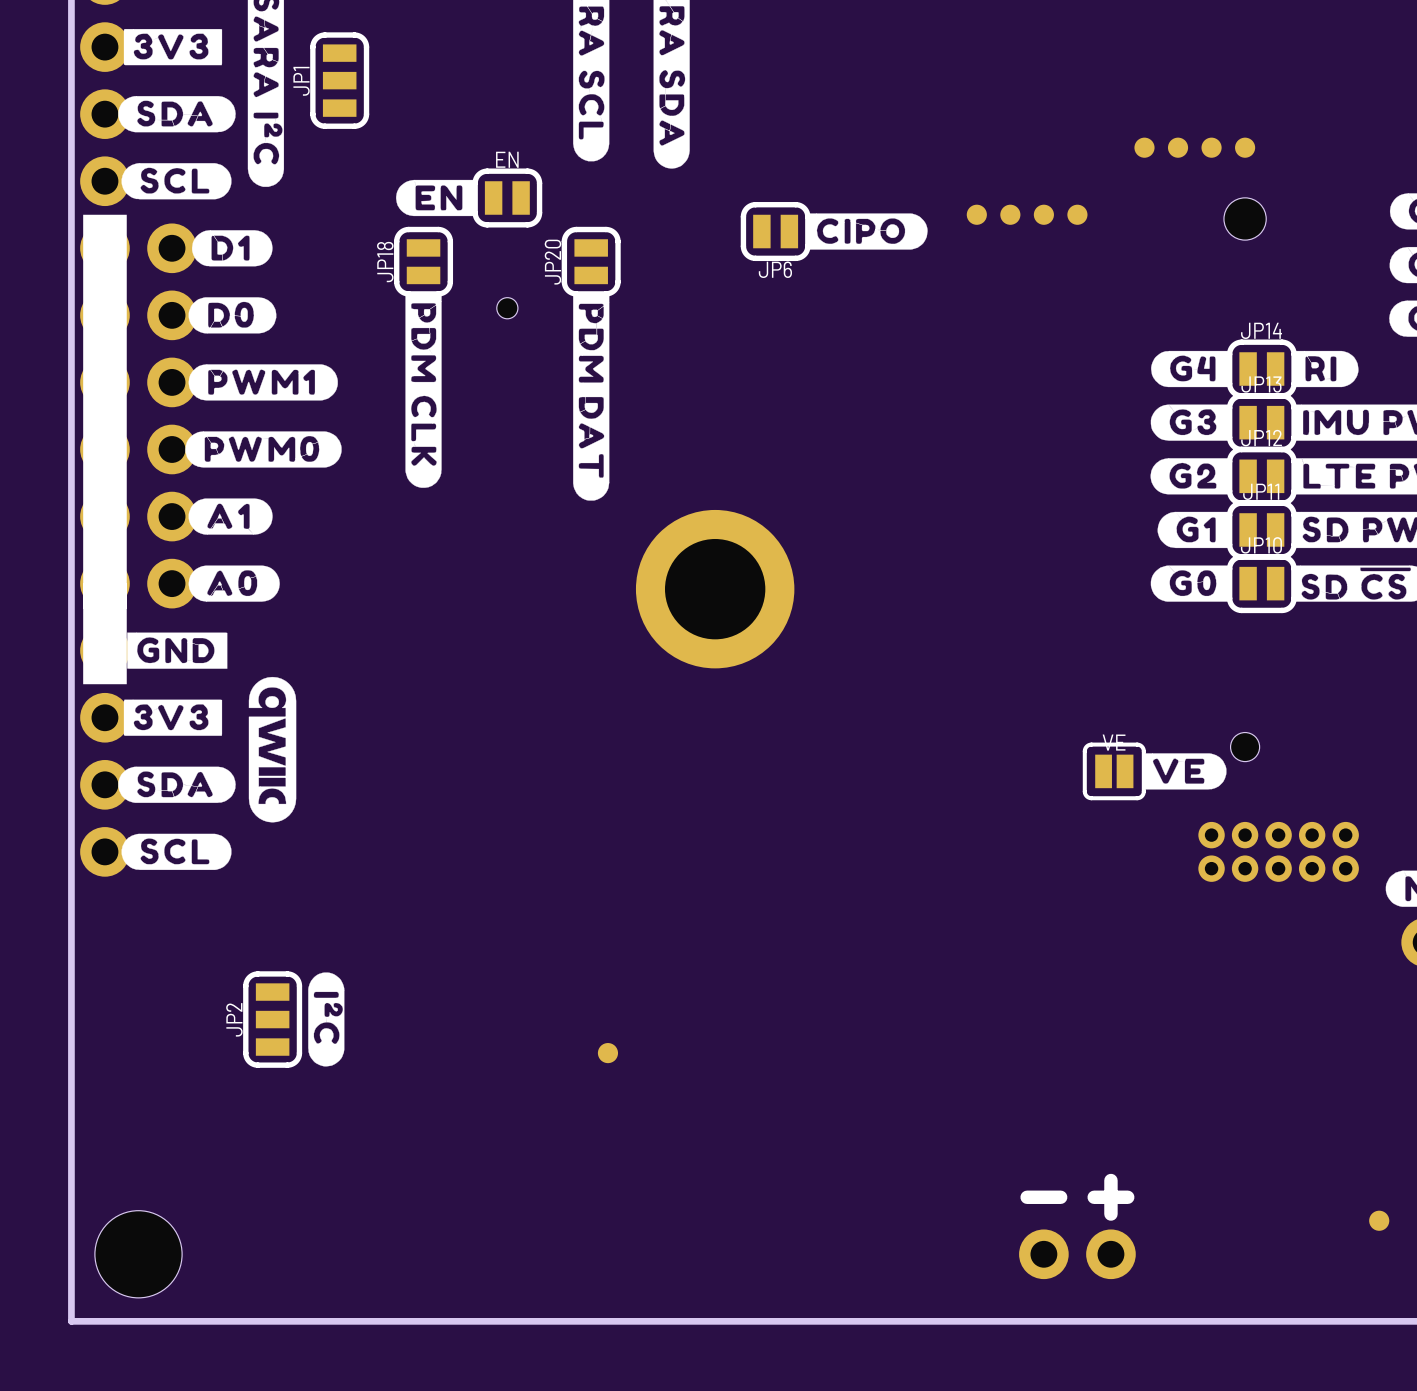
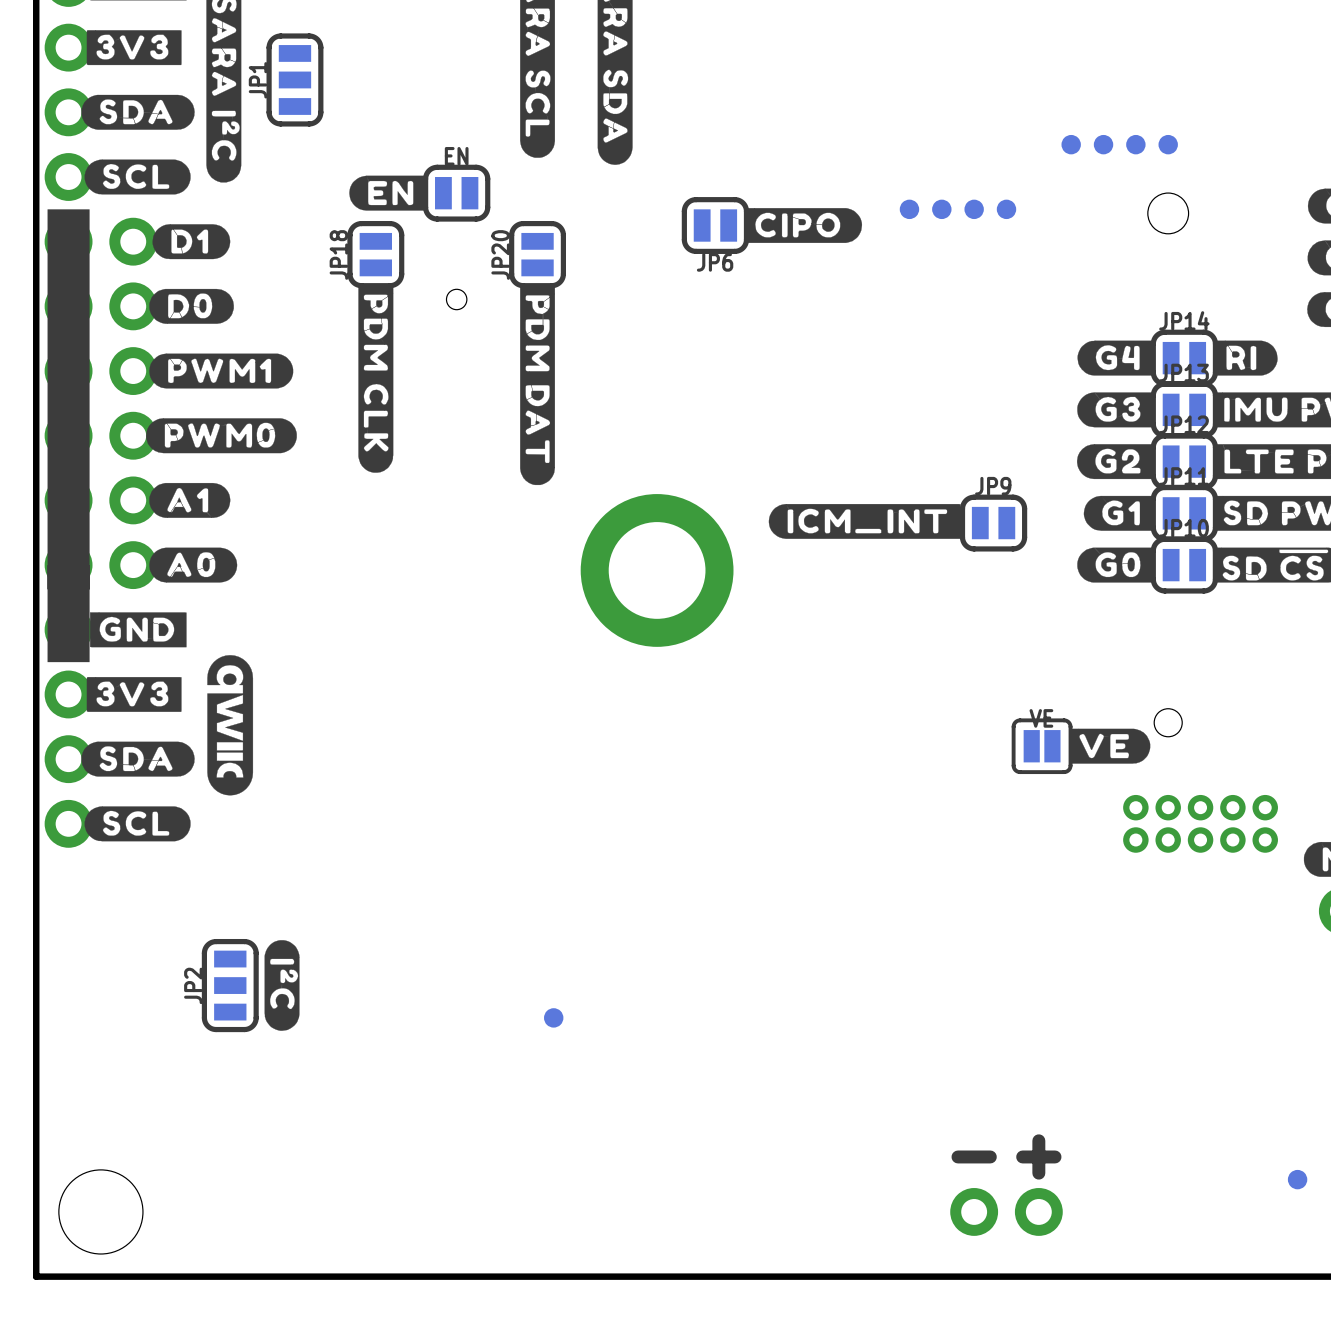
drawing: none -> [768, 504, 961, 539]
JP9: none -> (993, 523)

